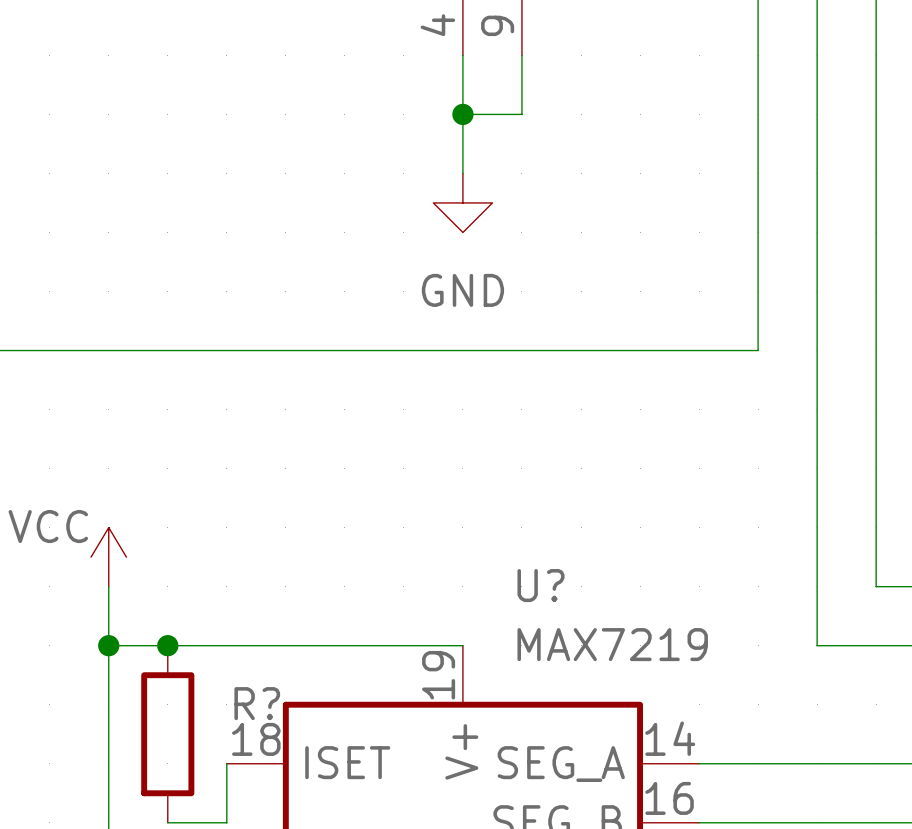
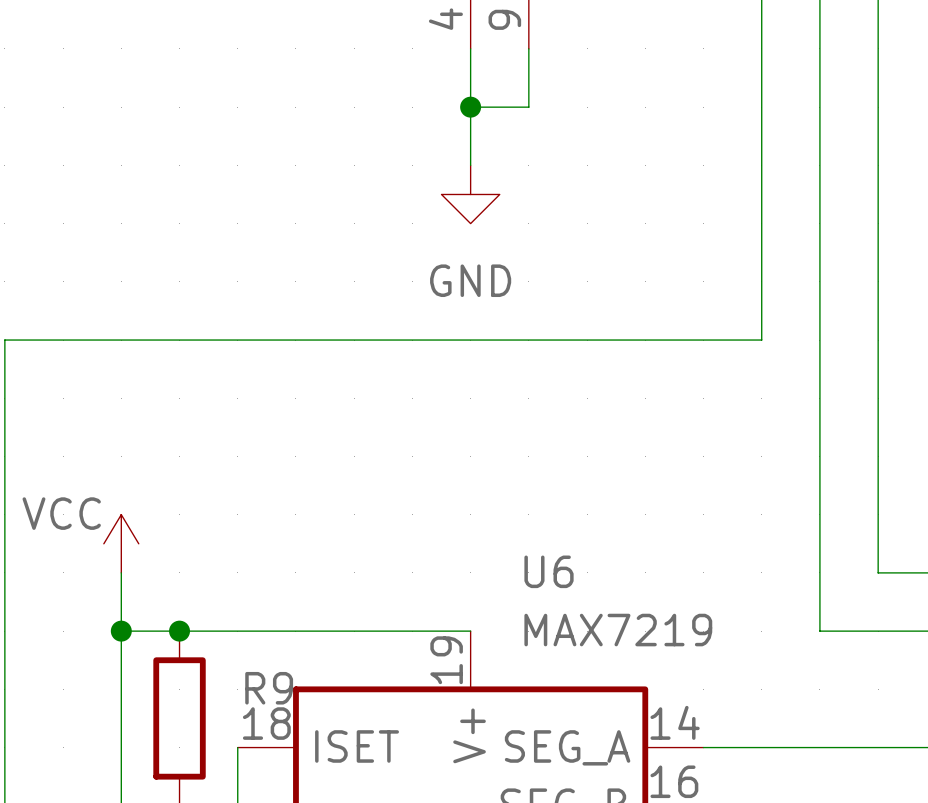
U? name: U? (541, 585) -> U6 (549, 571)
R? name: R? (257, 703) -> R9 (269, 688)

